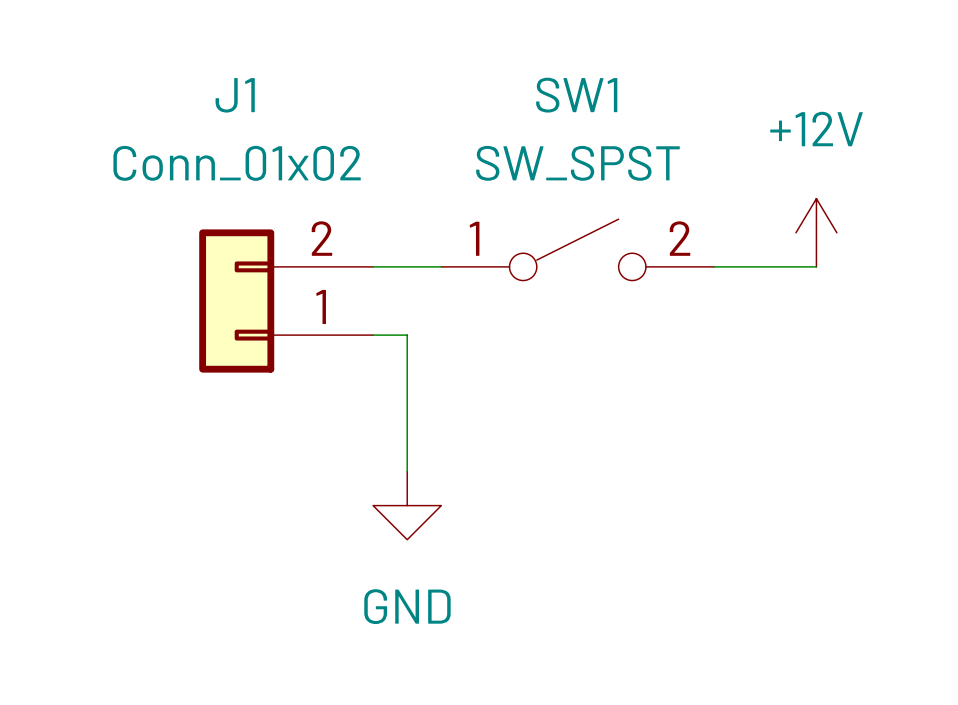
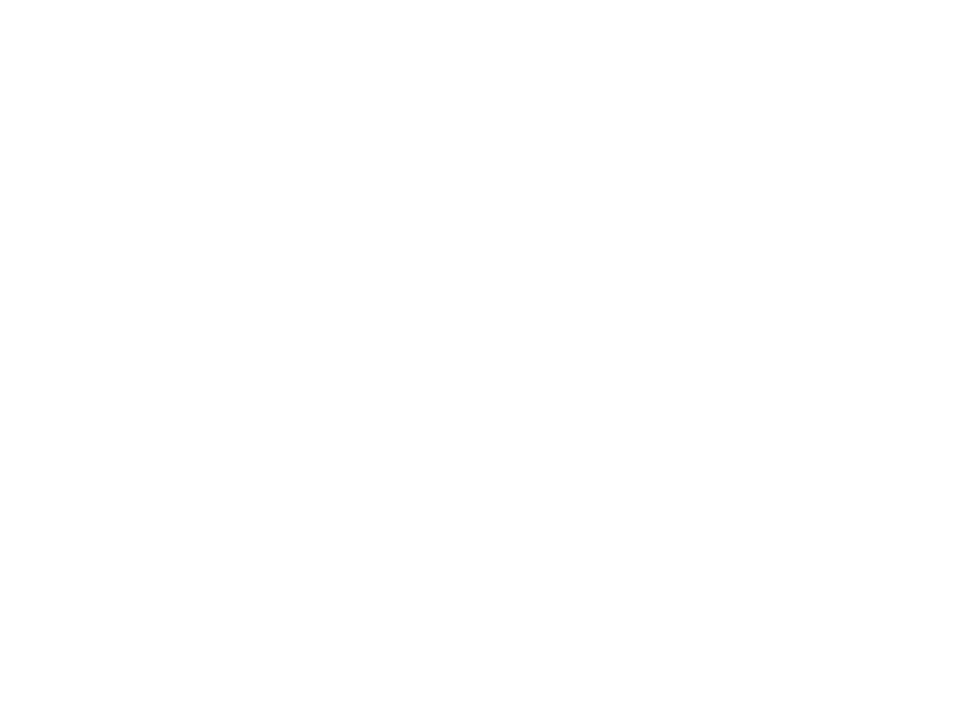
power symbol: +12V (816, 232) -> none
SW1: SW_SPST (577, 249) -> none
wire: (373, 266) (441, 266) -> none
wire: (714, 266) (816, 266) -> none
J1: Conn_01x02 (286, 301) -> none
wire: (373, 335) (407, 335) (407, 471) -> none
power symbol: GND (407, 505) -> none

